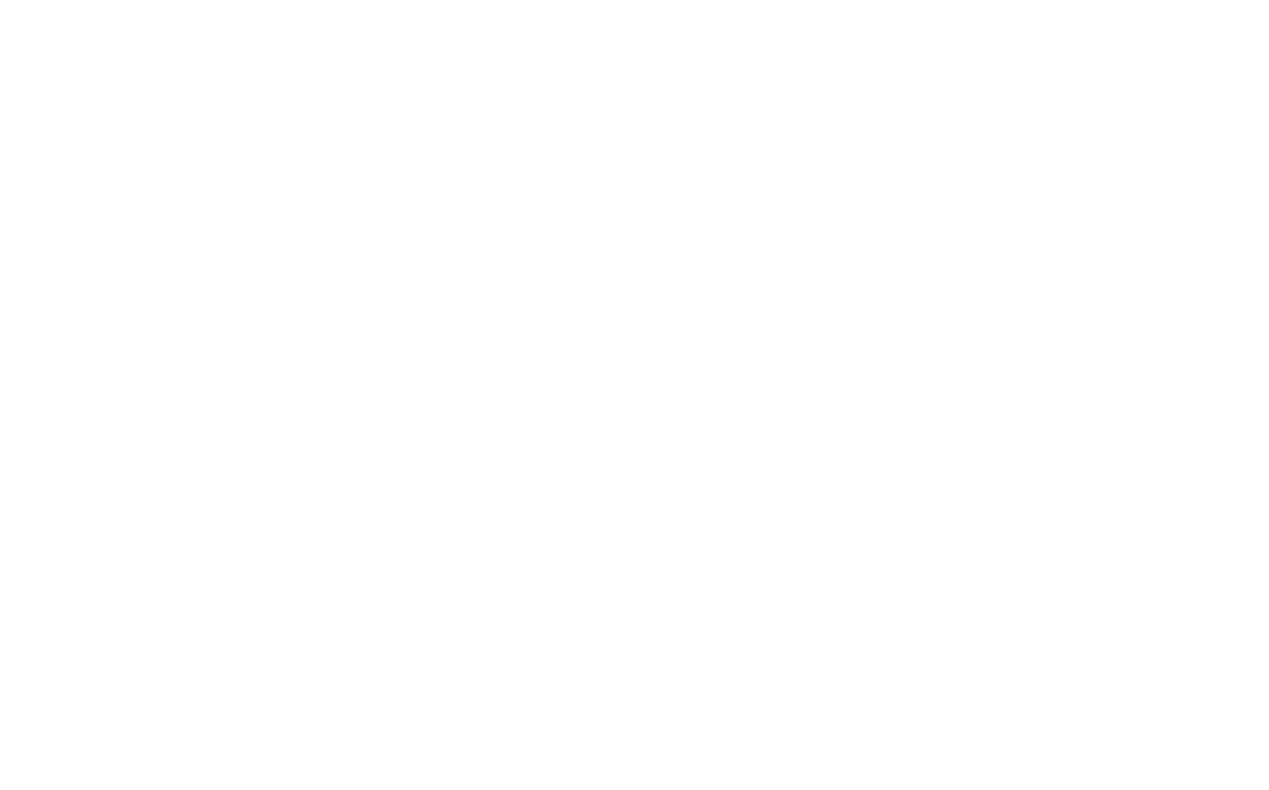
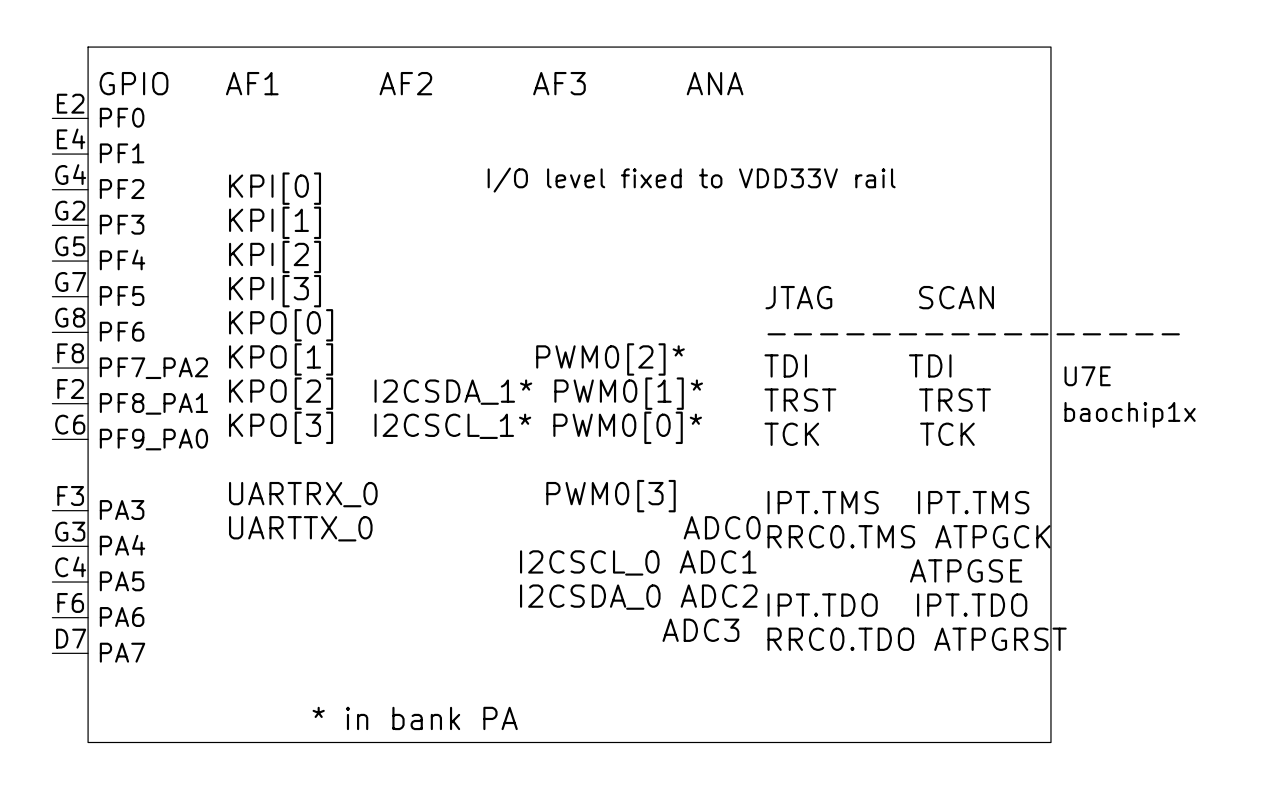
U7E: none -> baochip1x (551, 394)

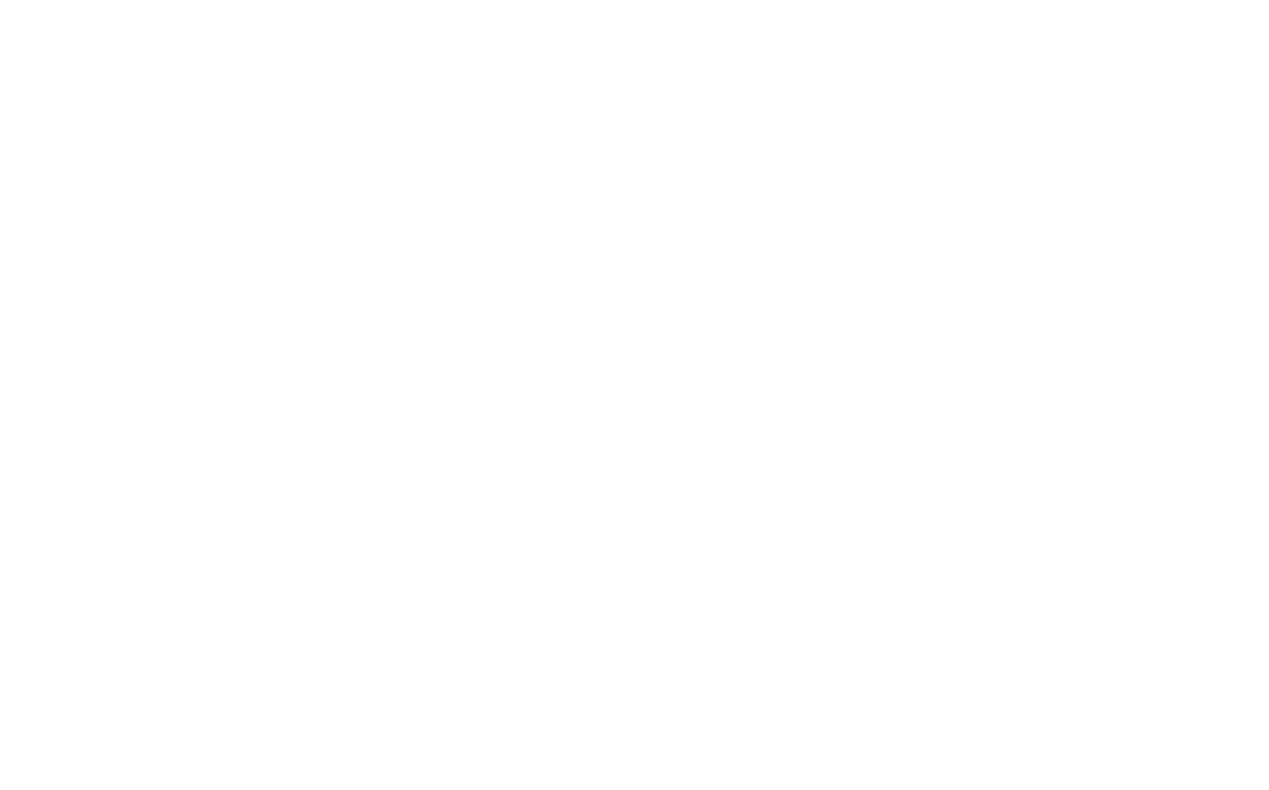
U7E: baochip1x (551, 394) -> none

